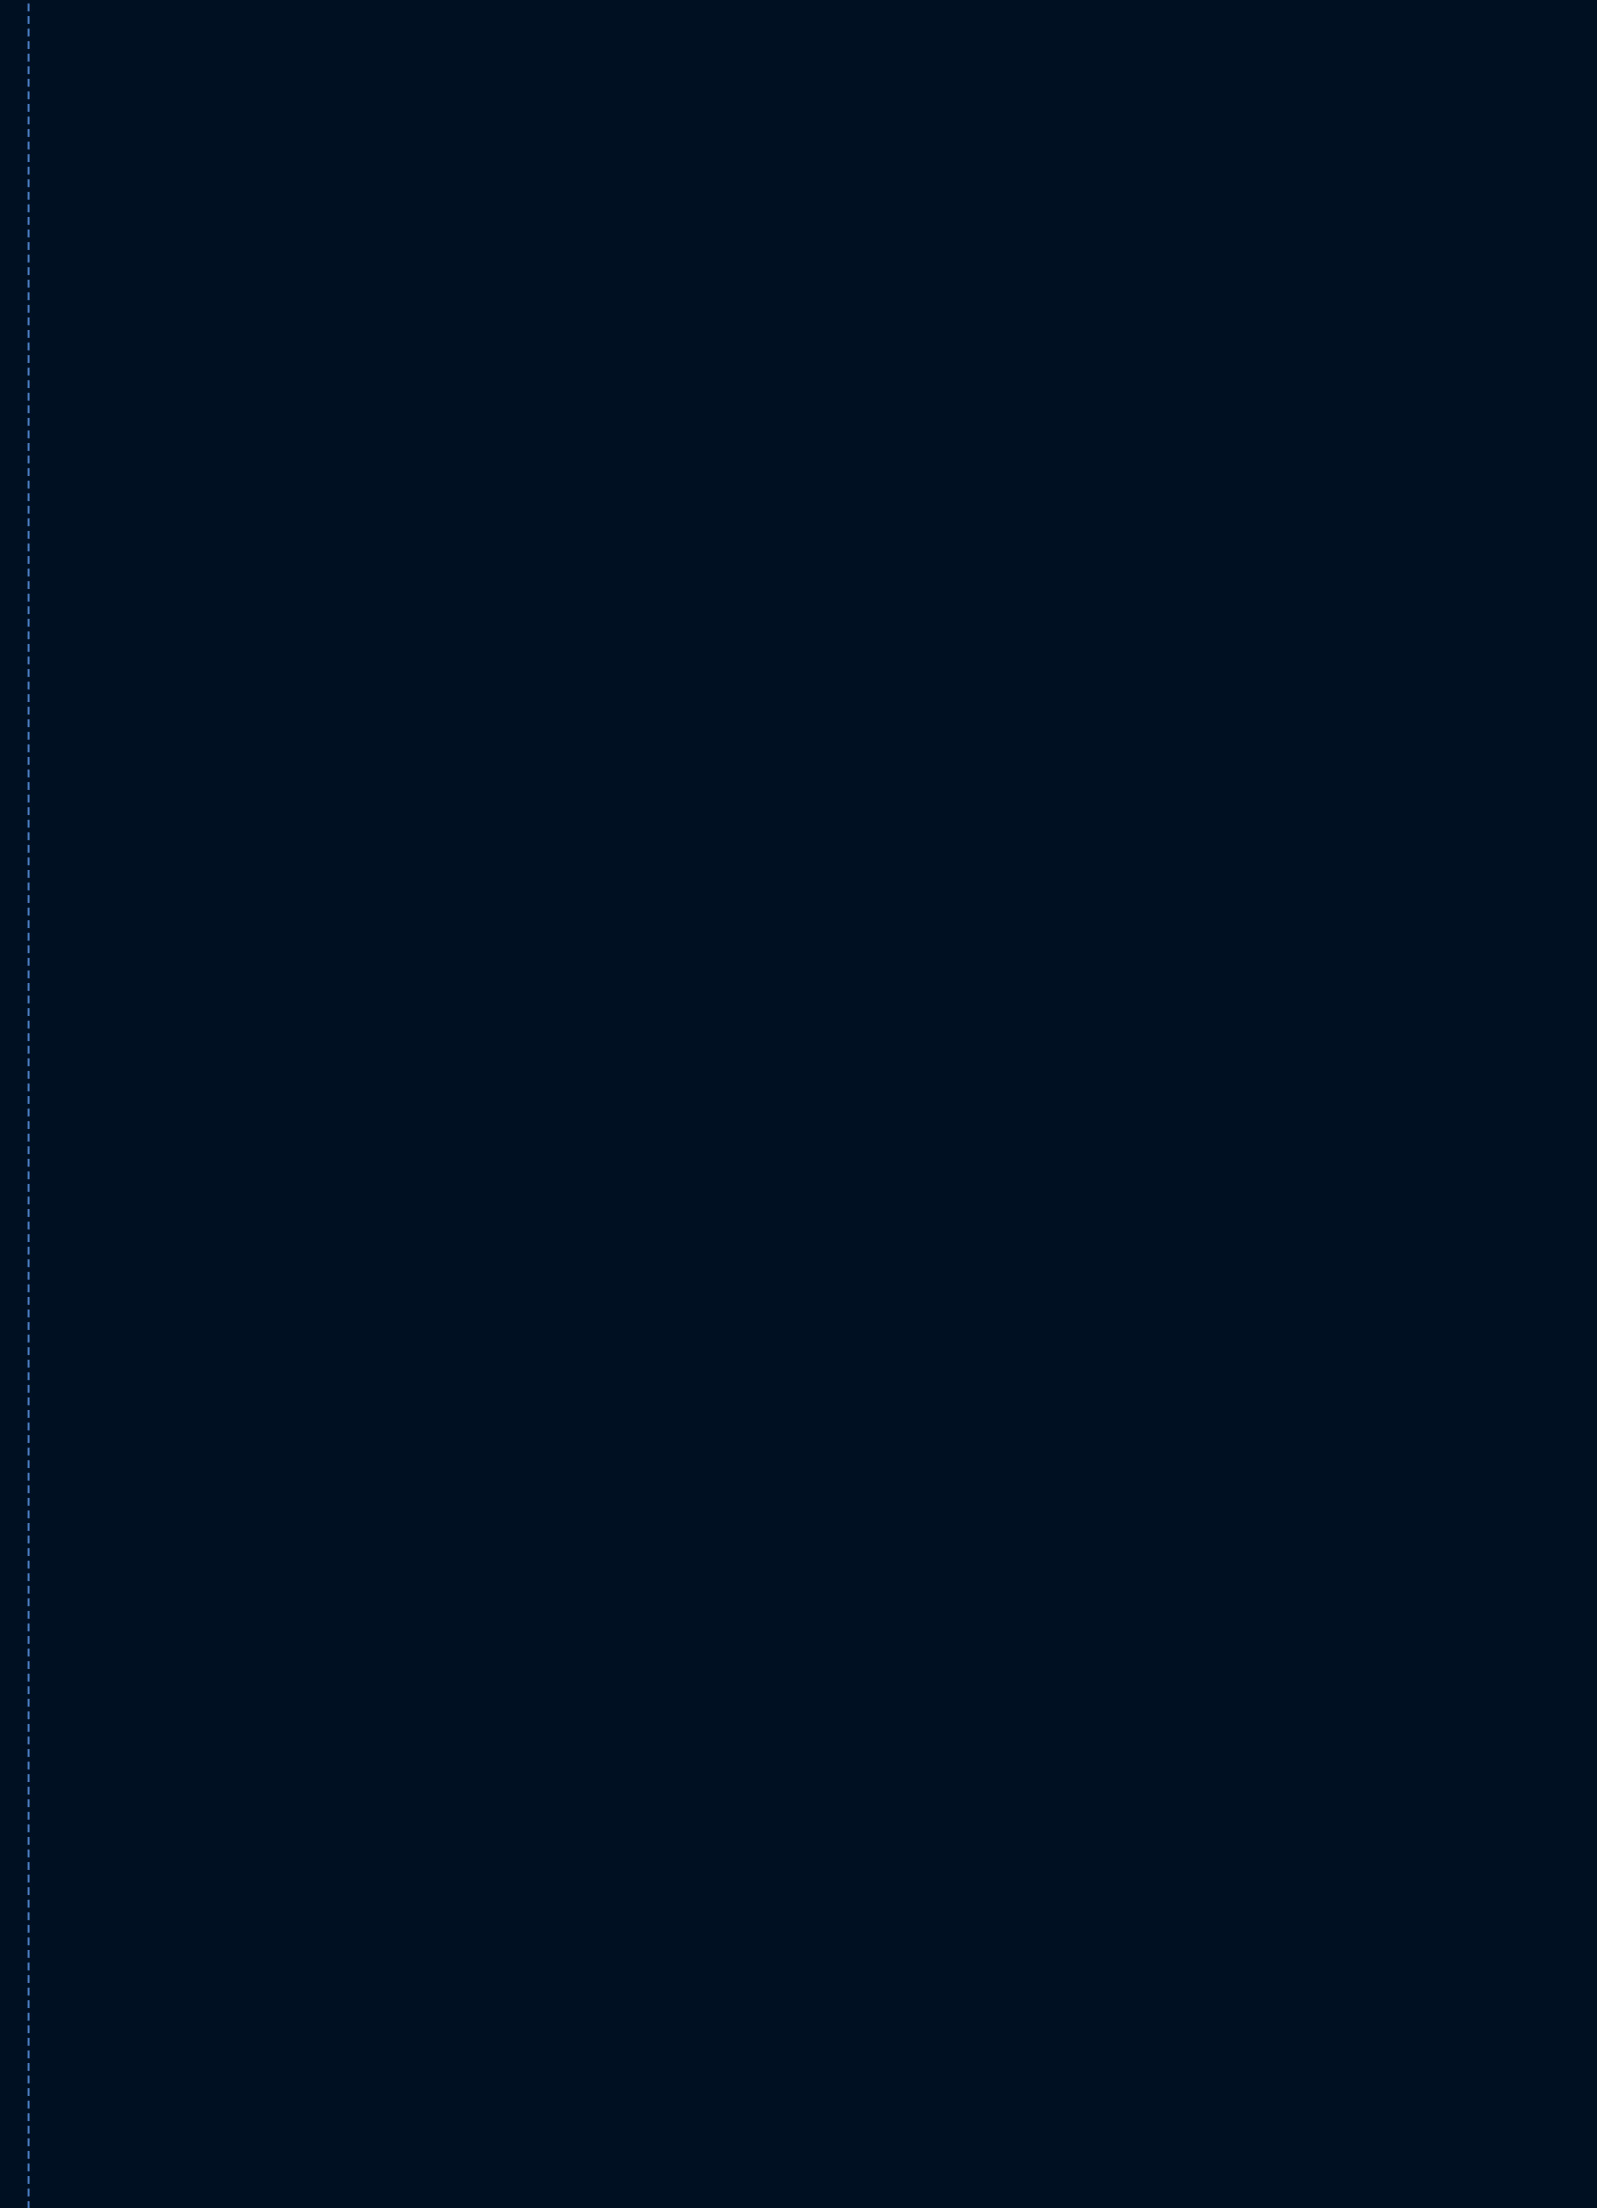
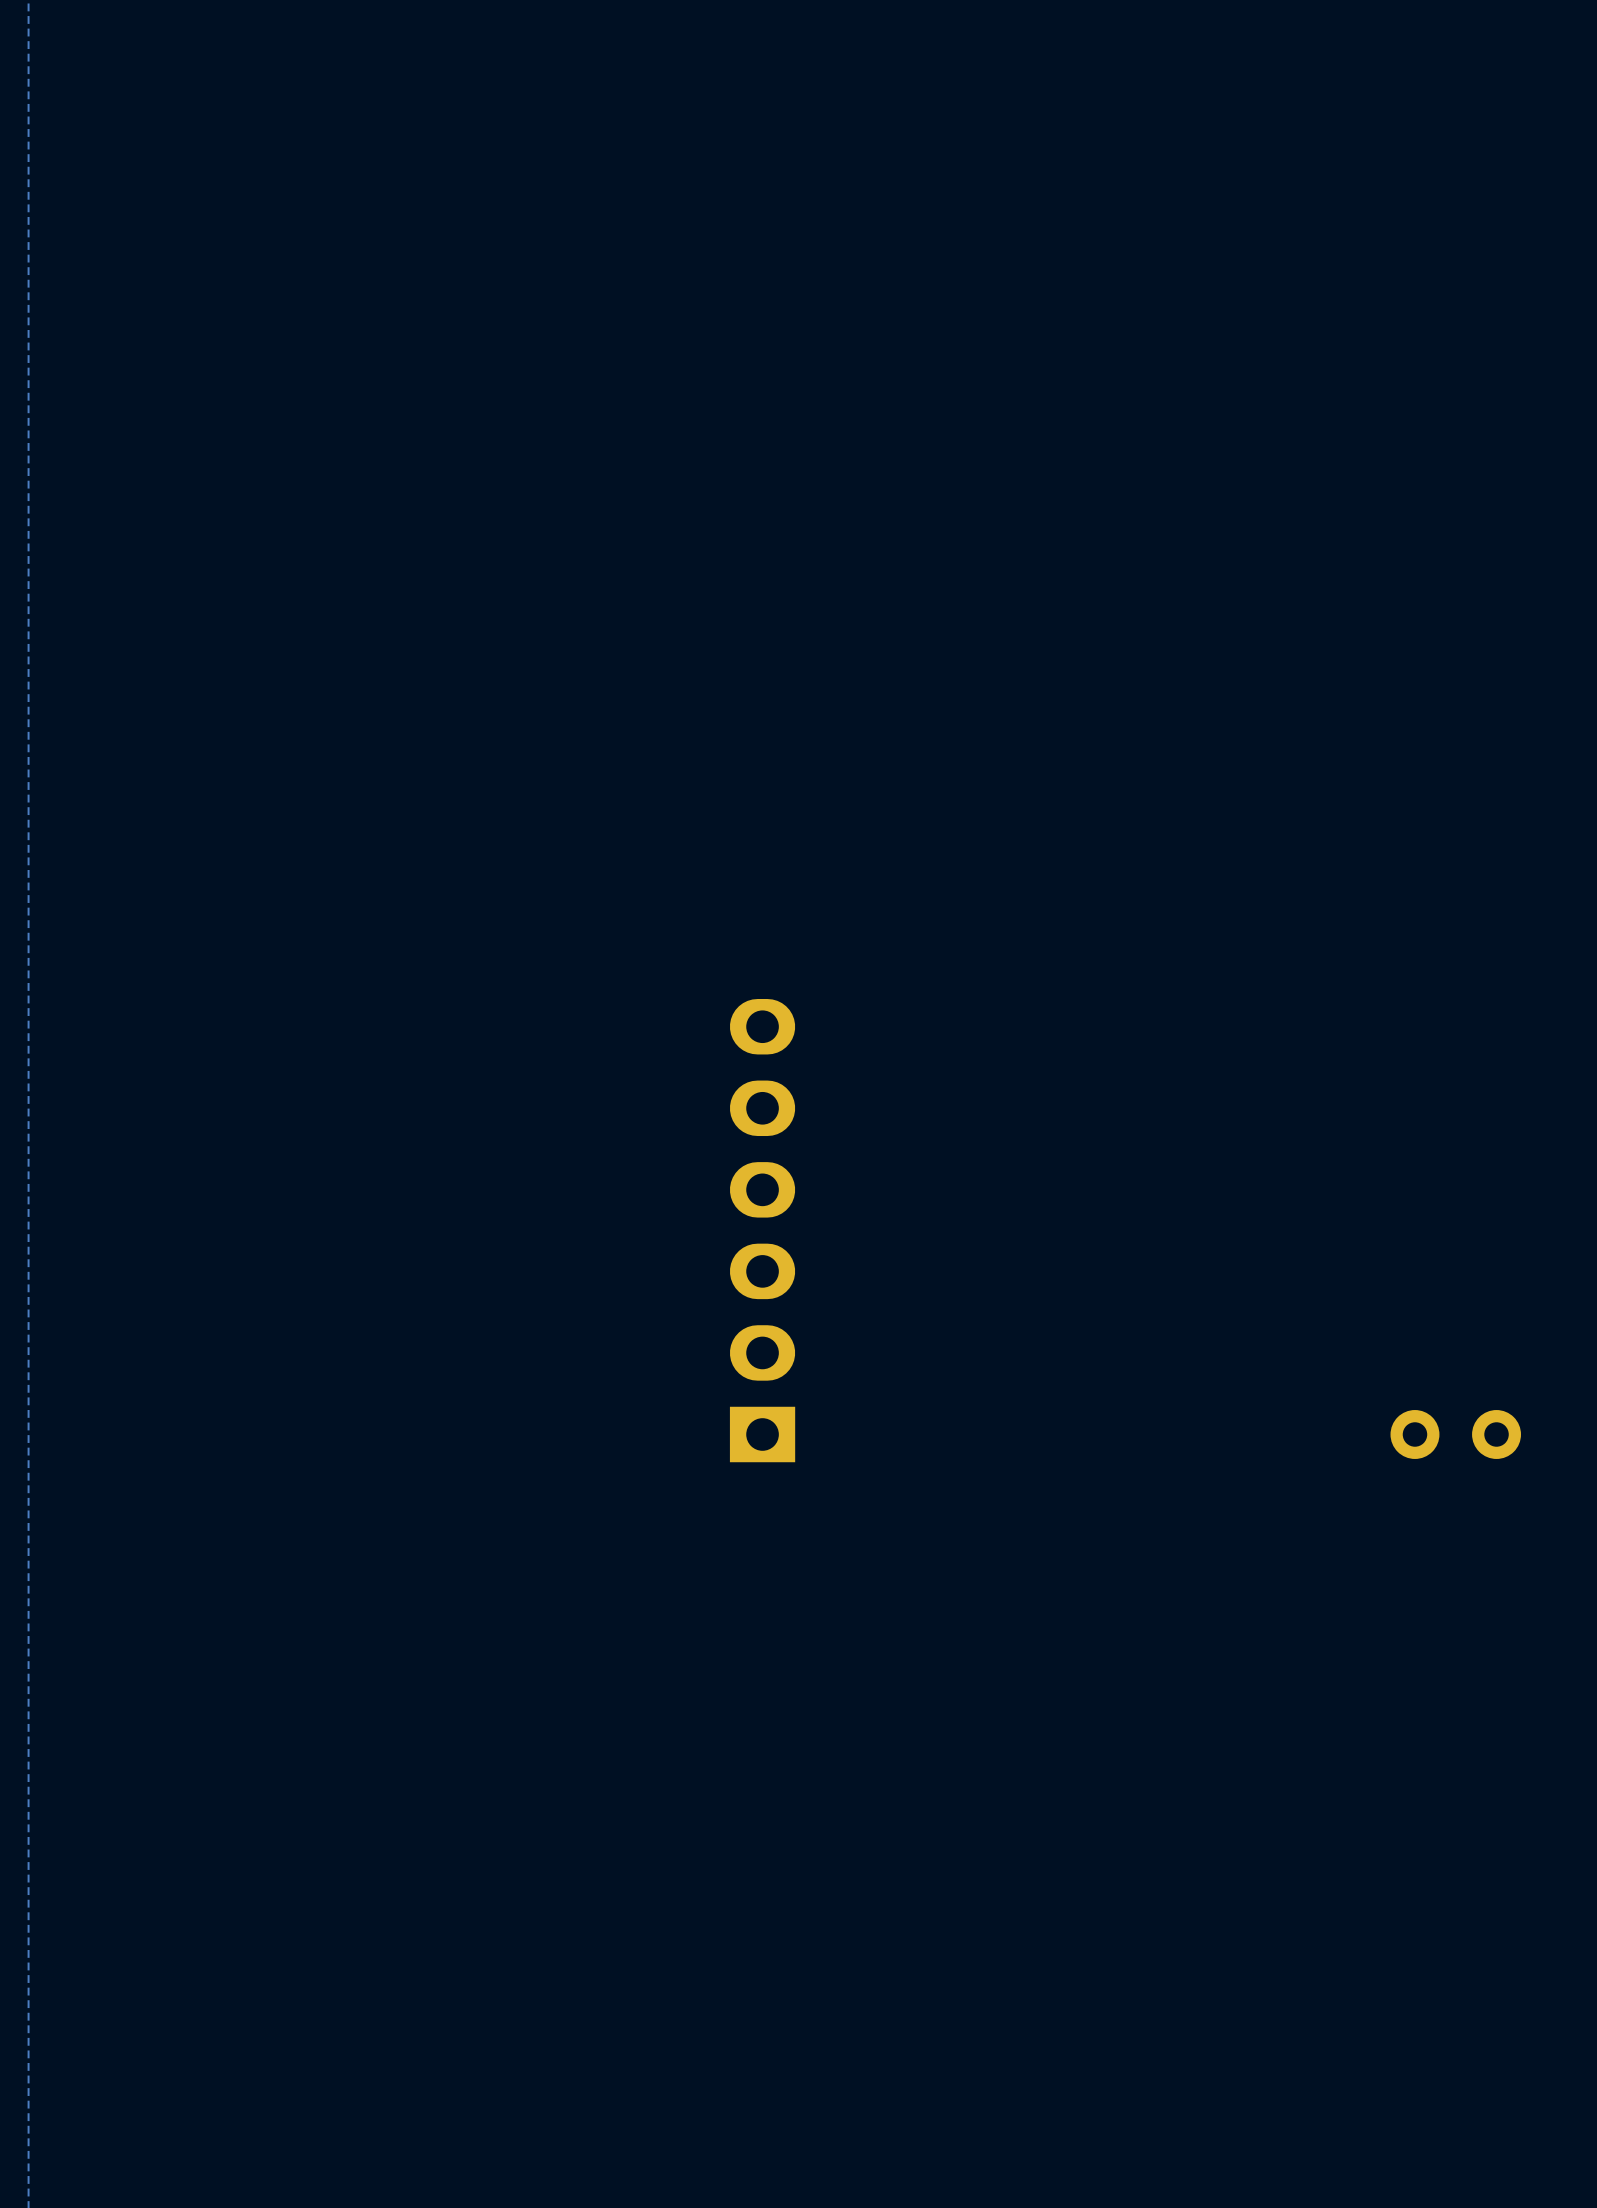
part: none -> (762, 1230)
part: none -> (1455, 1434)

